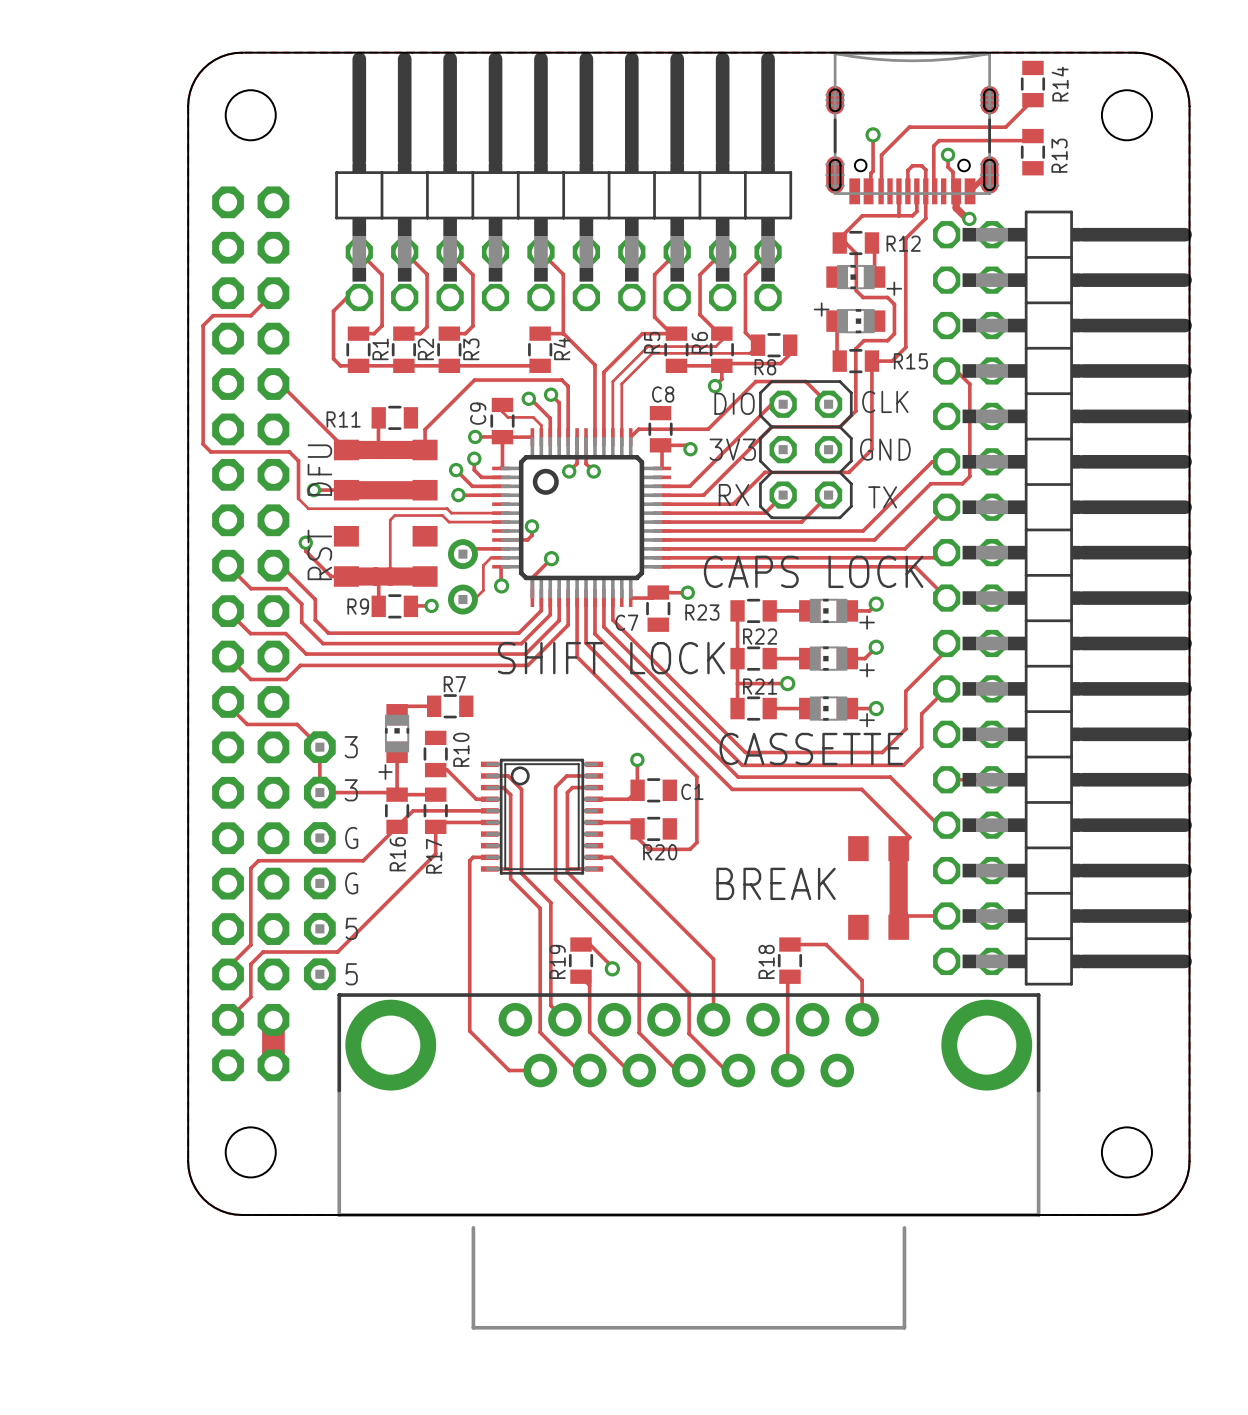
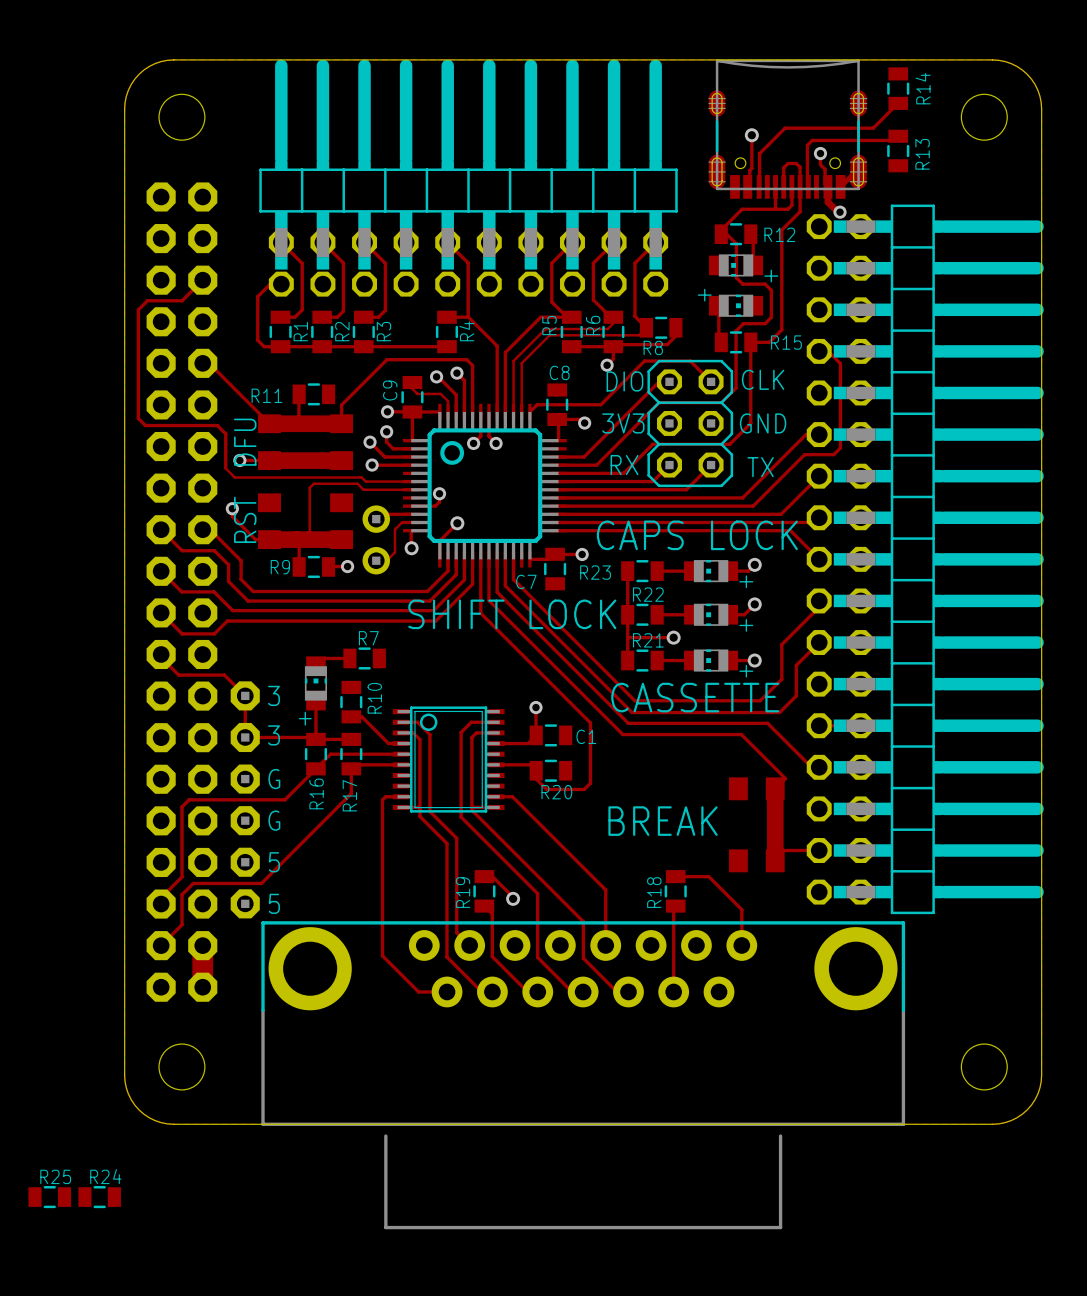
R25: none -> (49, 1197)
R24: none -> (99, 1197)

